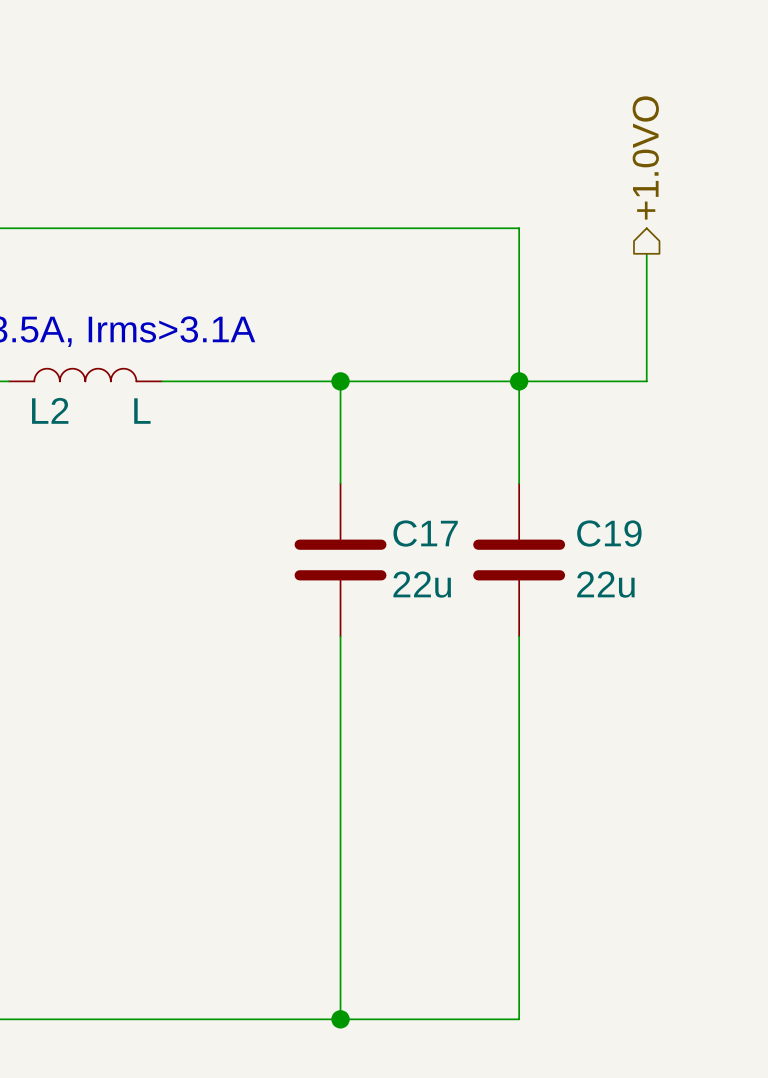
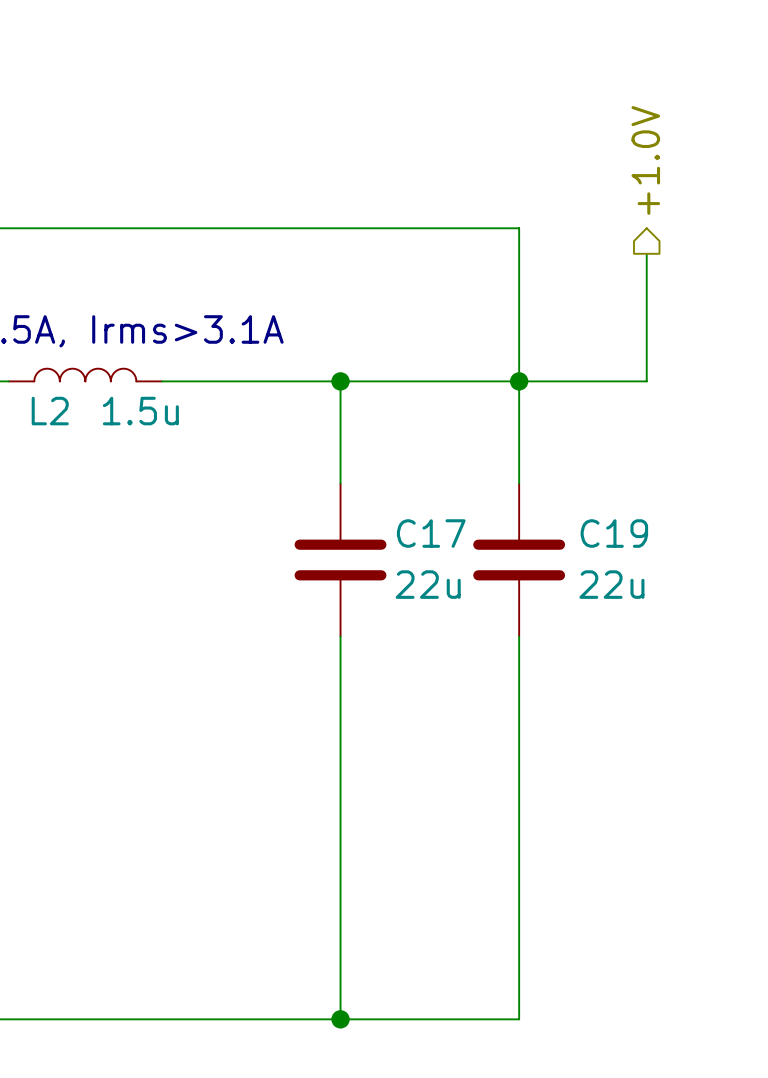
hierarchical label: +1.0VO (645, 157) -> +1.0V (645, 160)
L2 value: L (142, 411) -> 1.5u (140, 411)

